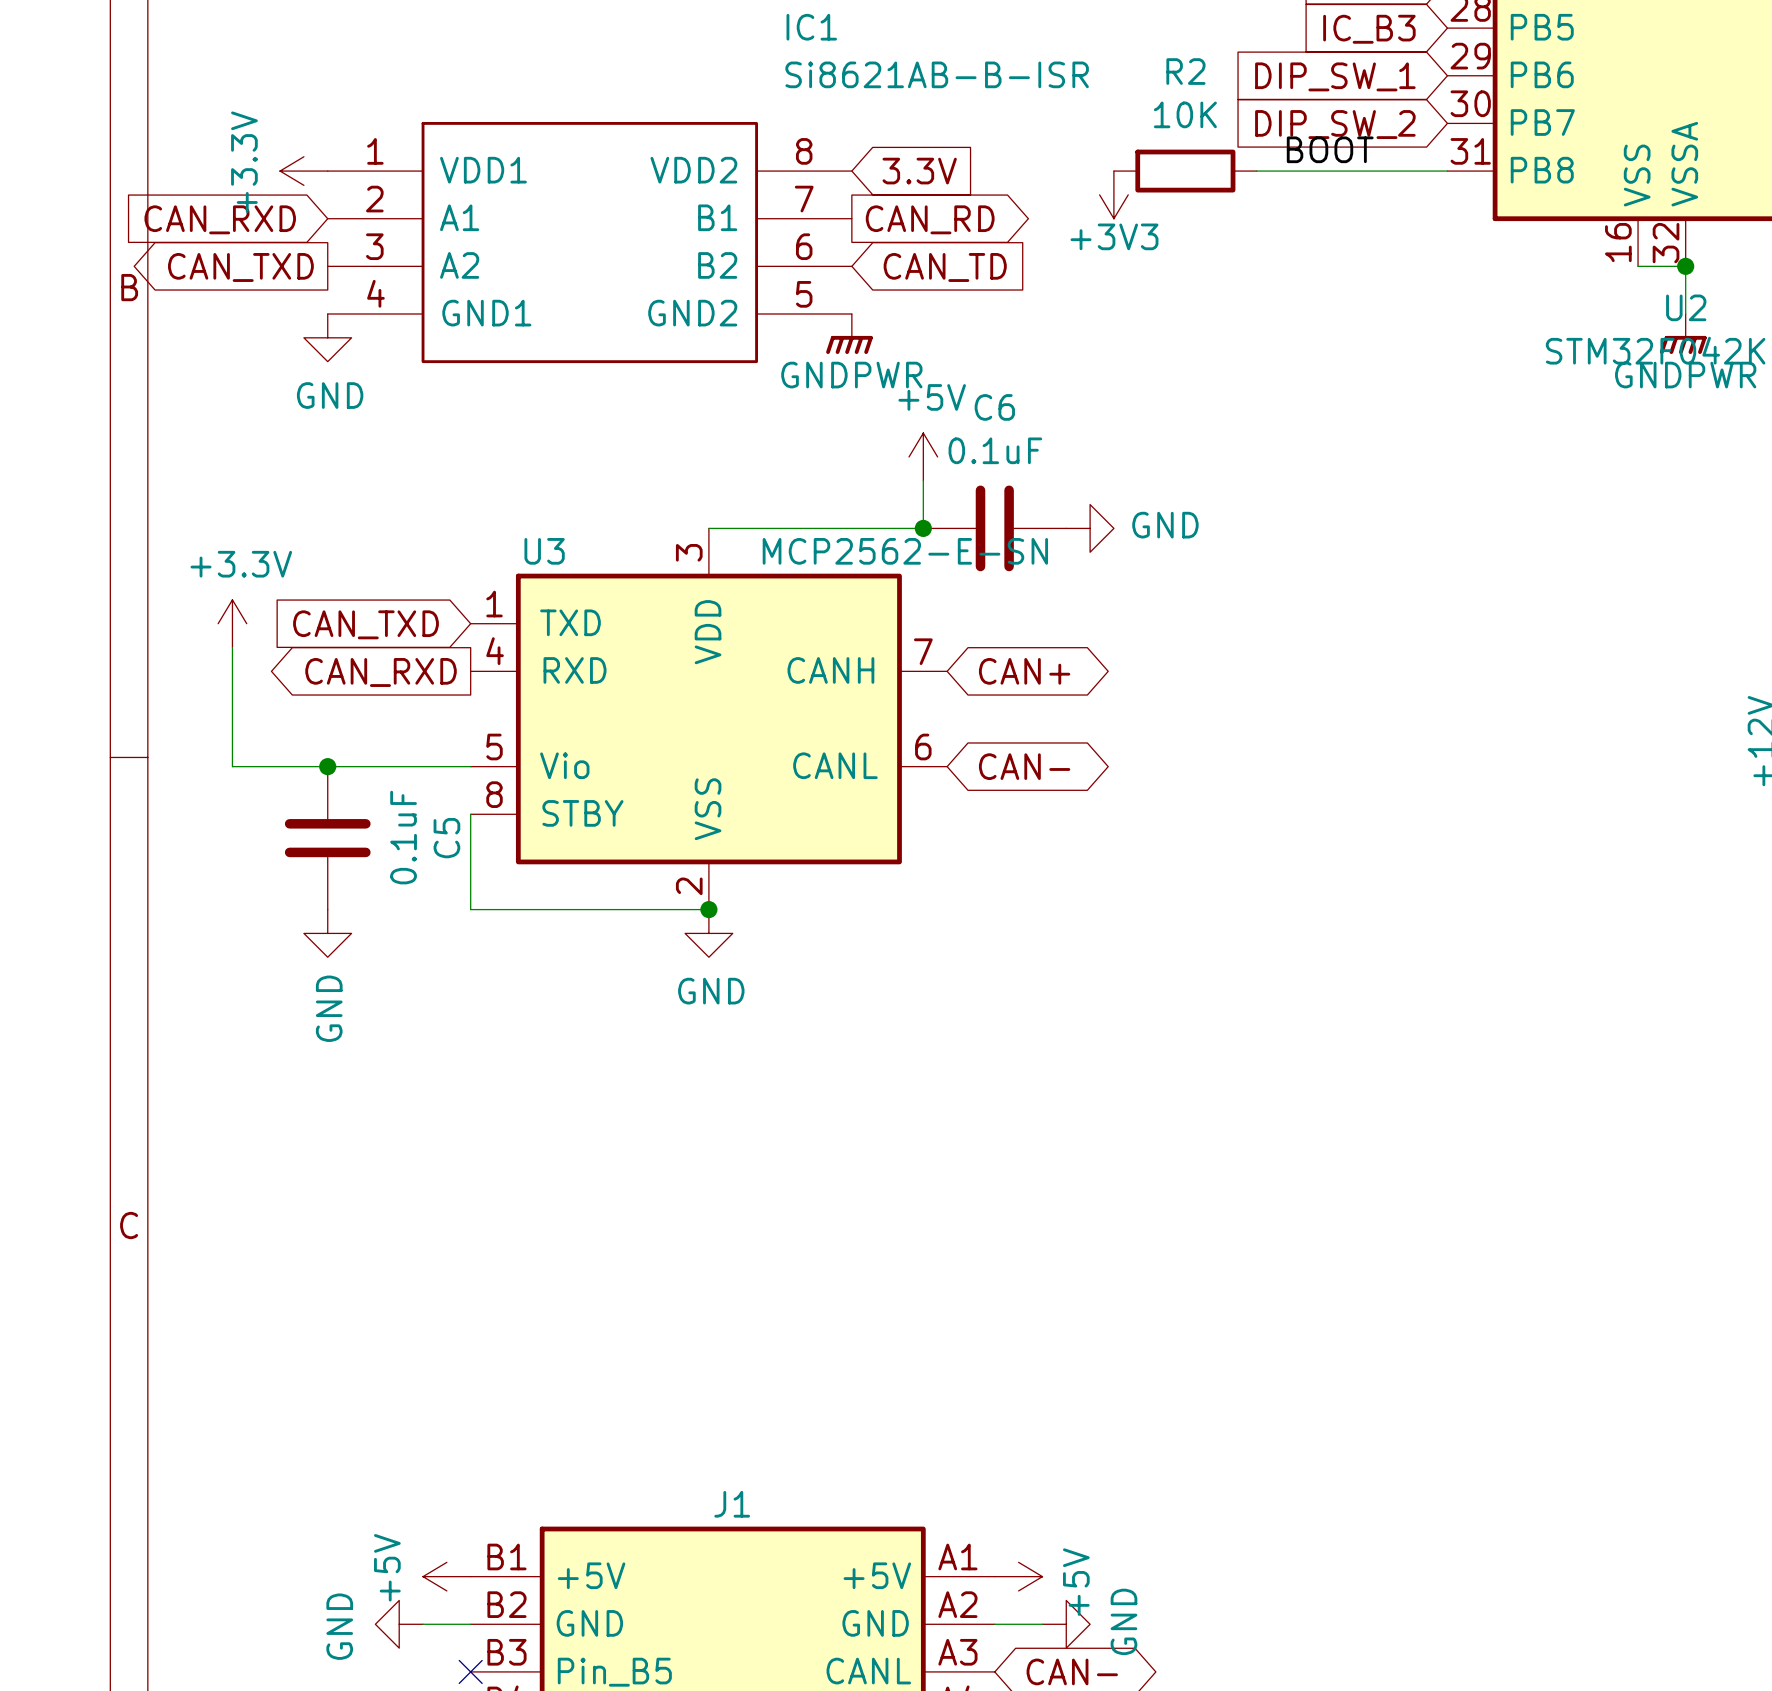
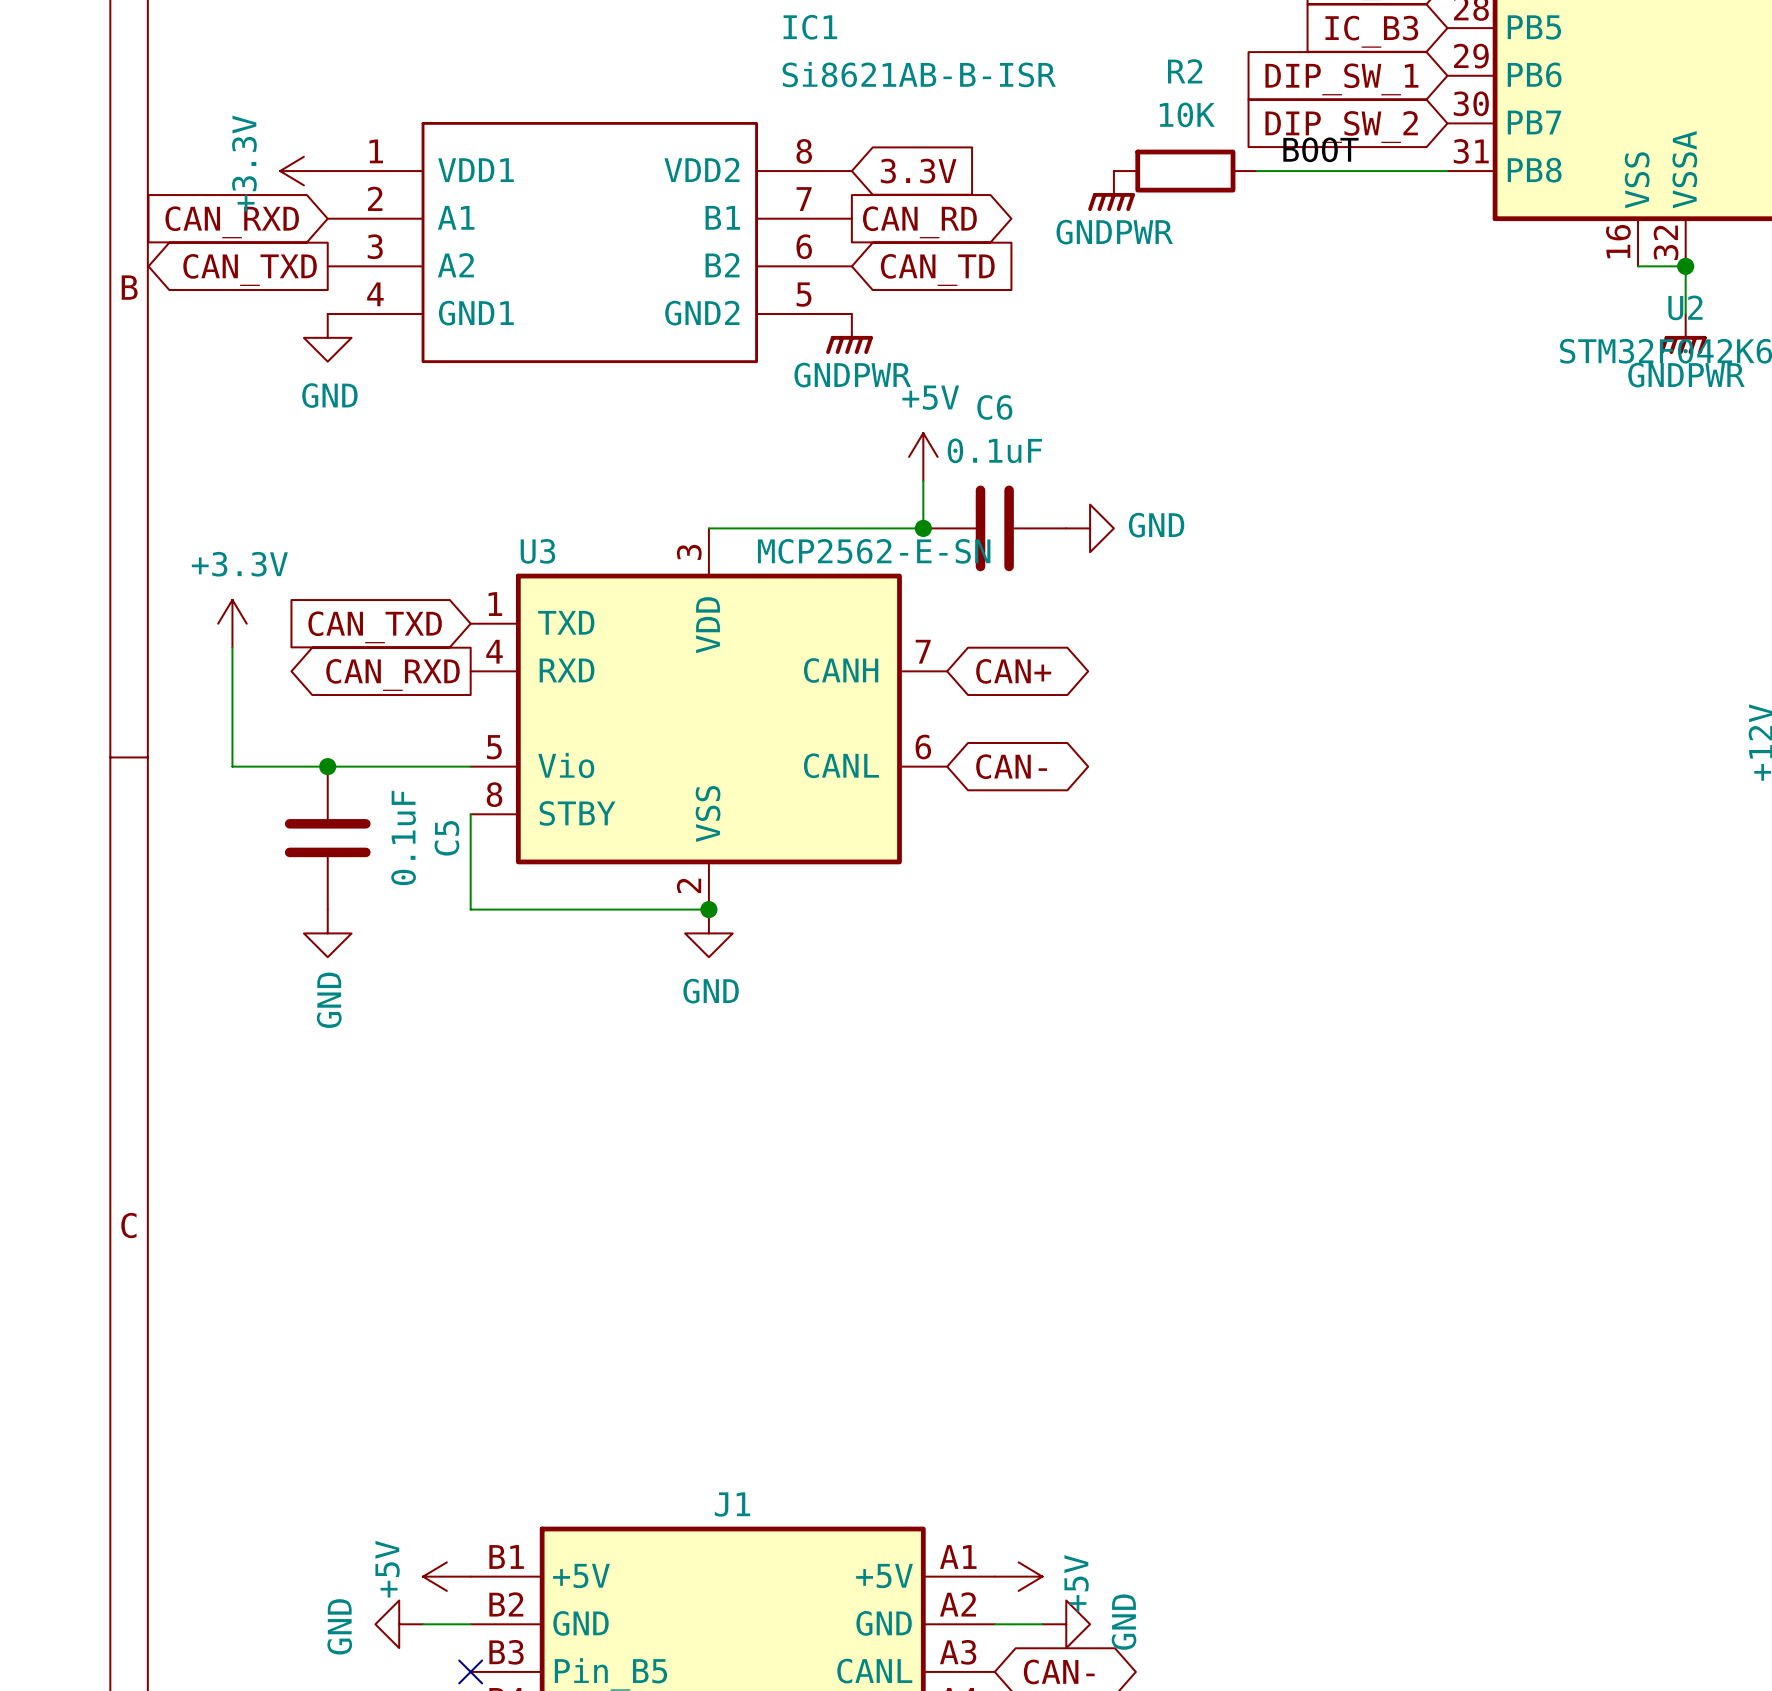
power symbol: +3V3 (1113, 194) -> GNDPWR (1111, 191)

